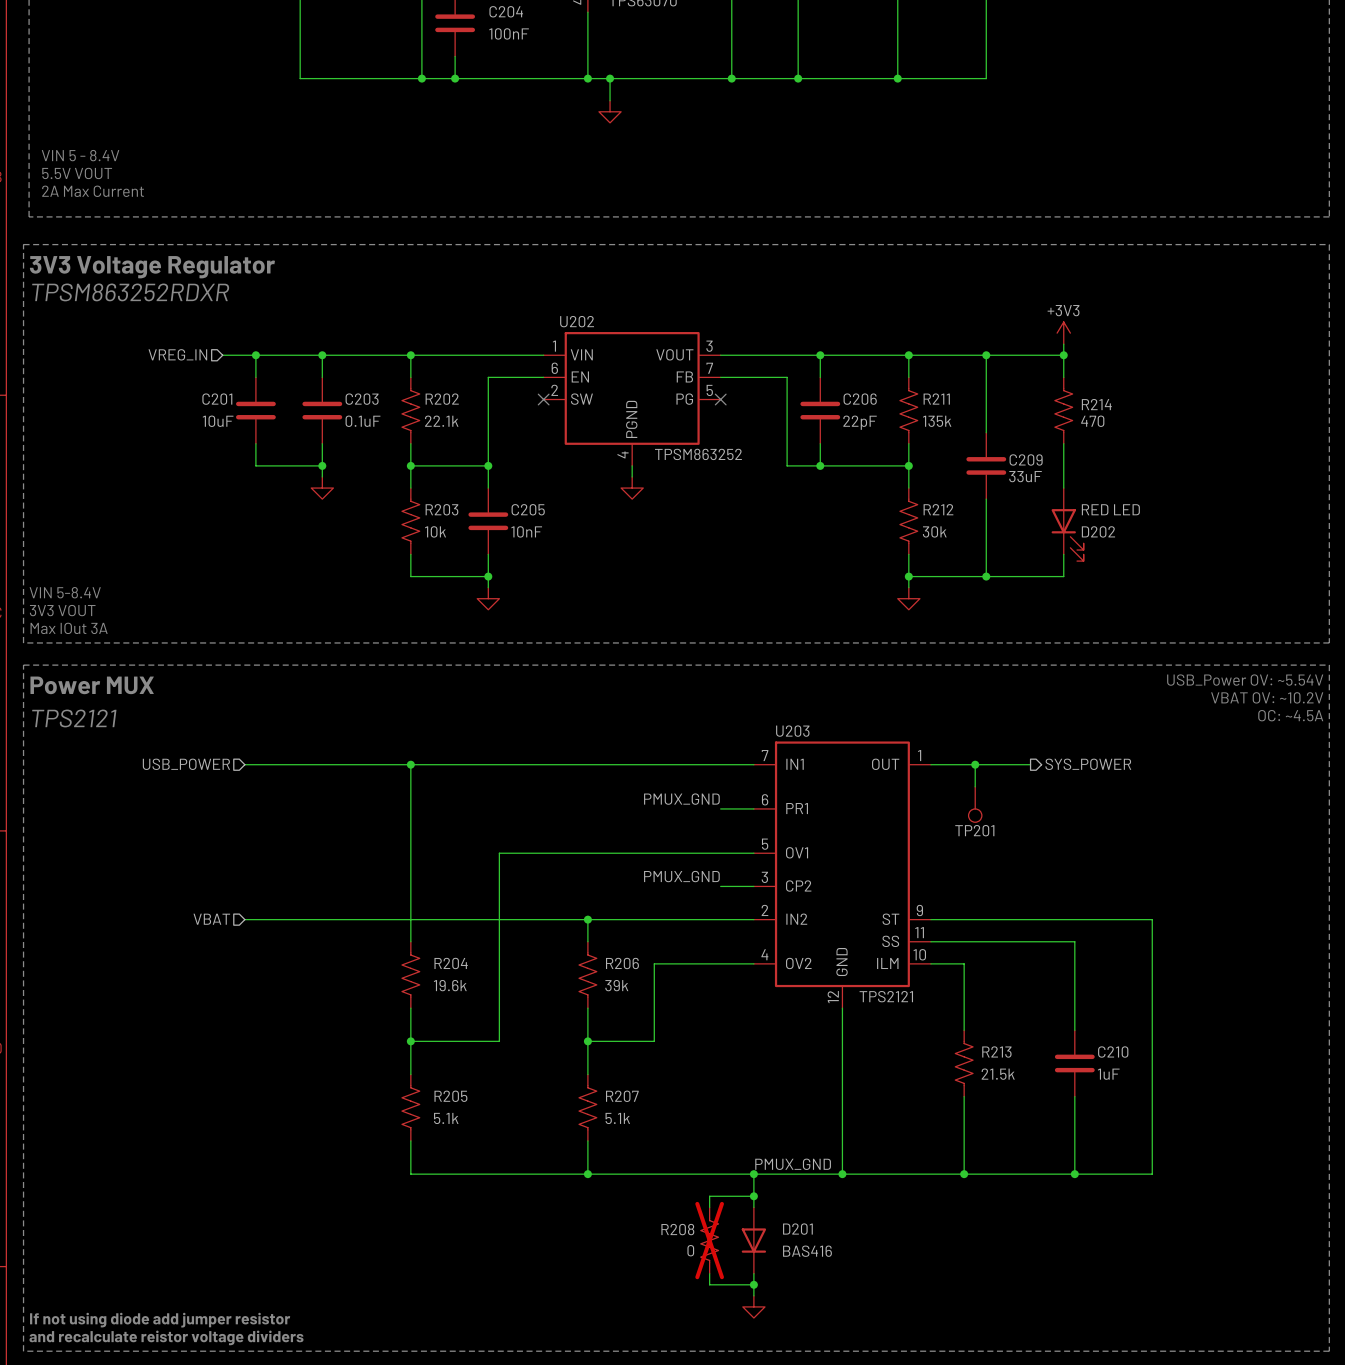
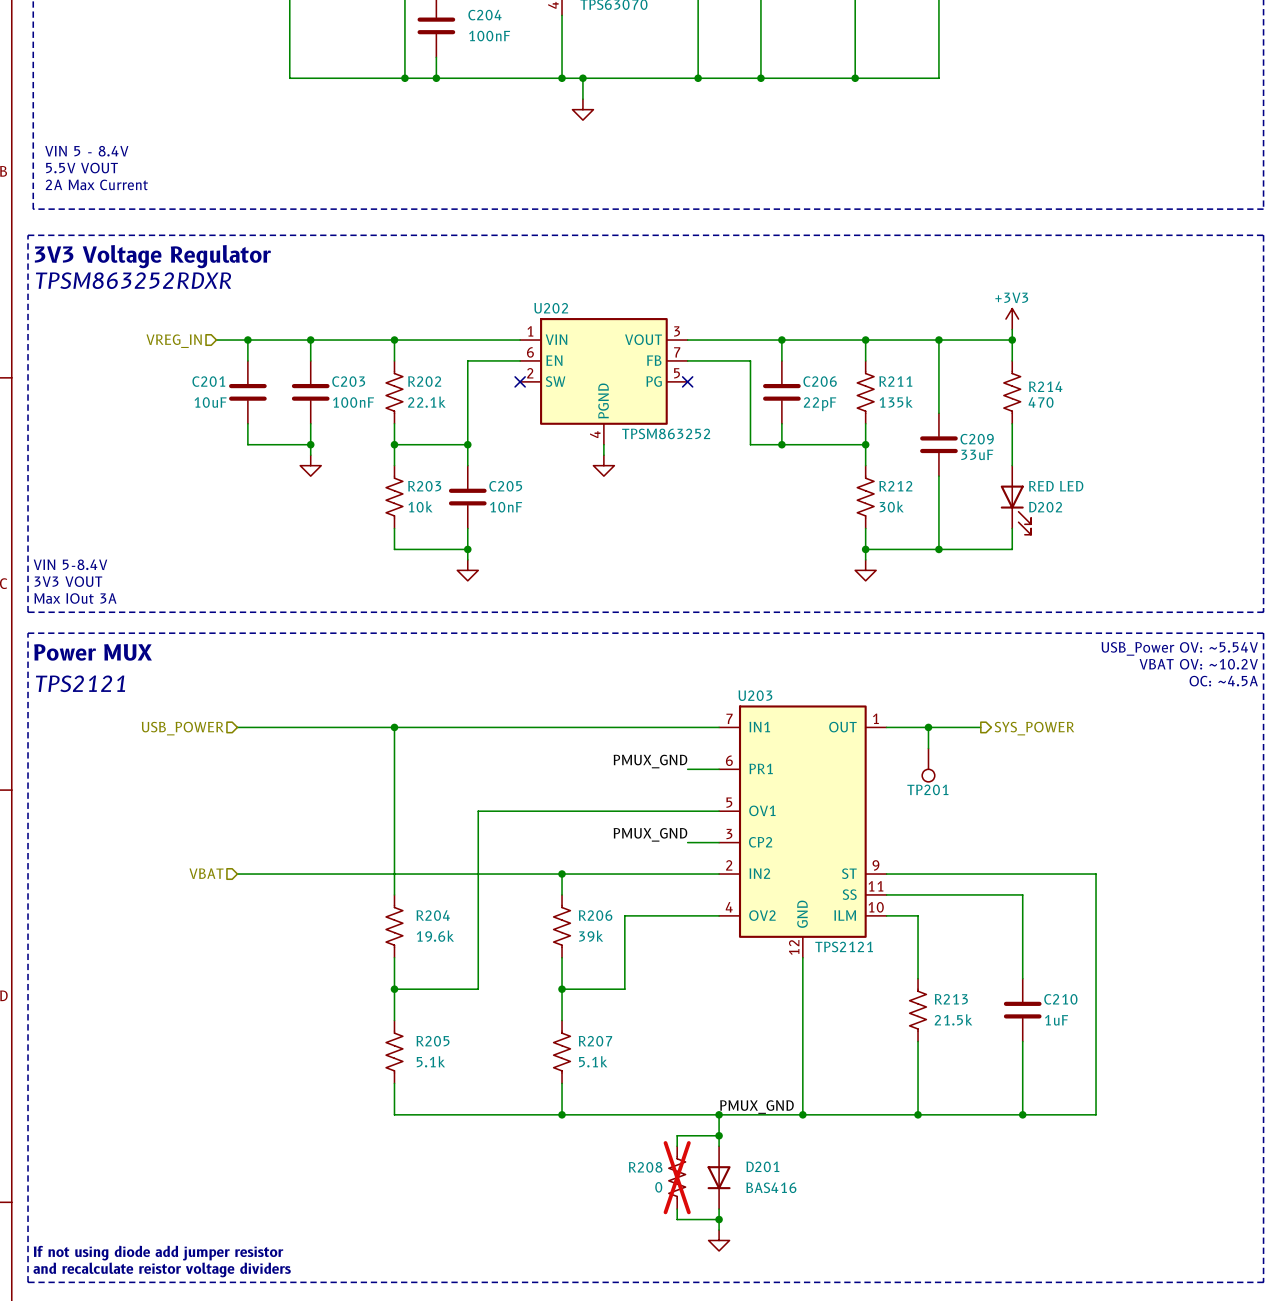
C203 value: 0.1uF (362, 421) -> 100nF (353, 402)

